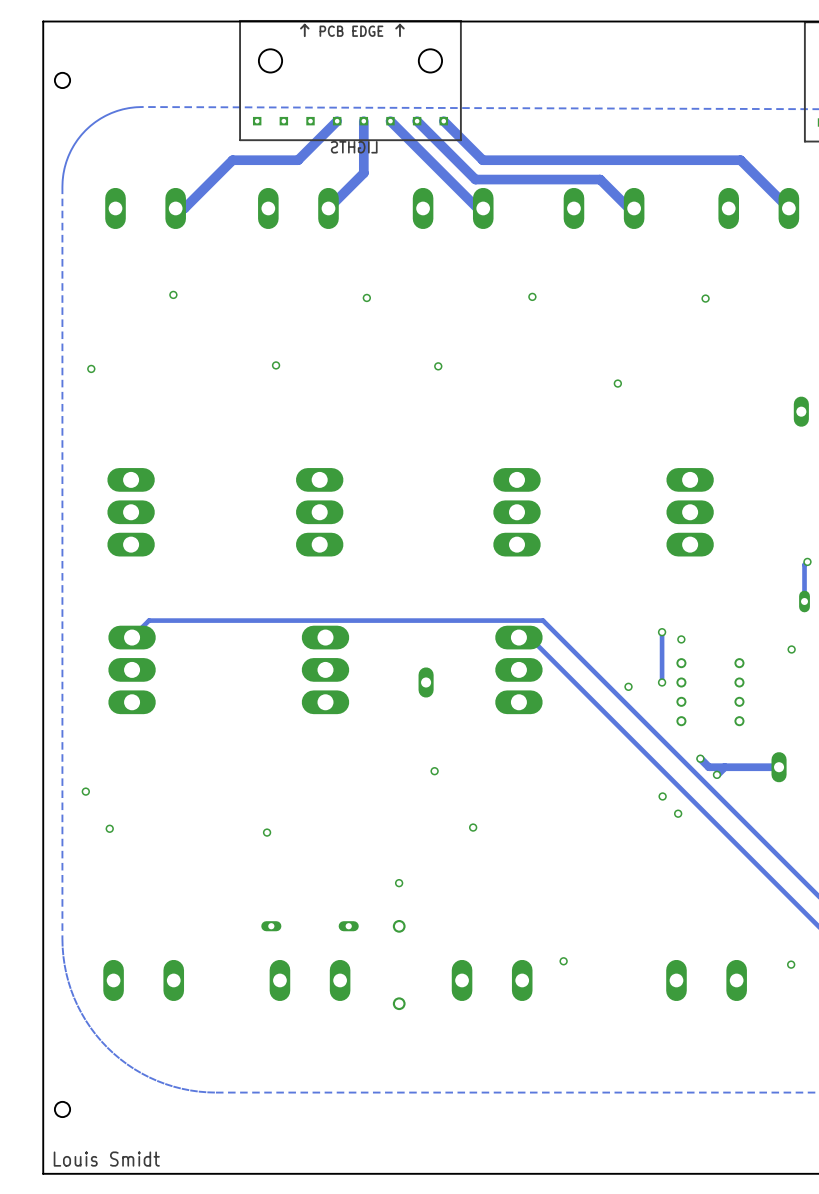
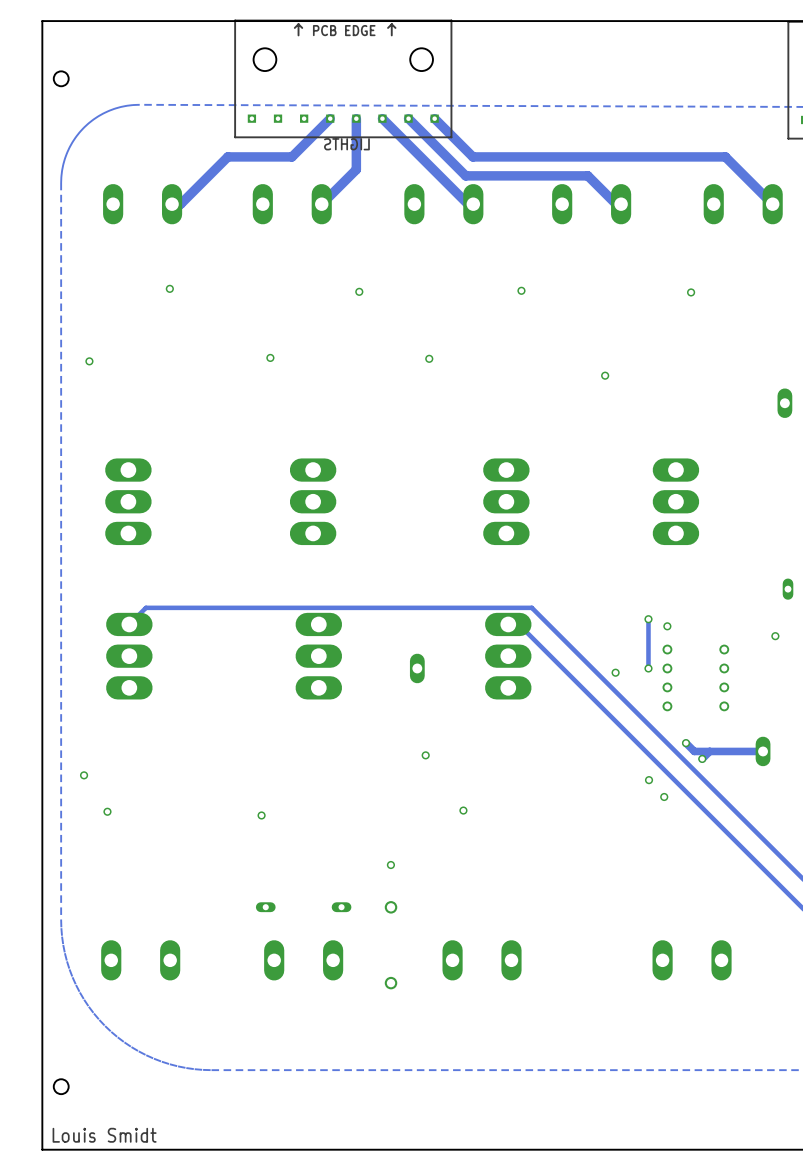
track: (807, 561) (804, 564) (804, 601) -> none
via: (807, 561) -> none
via: (563, 961) -> none
via: (791, 964) -> none

